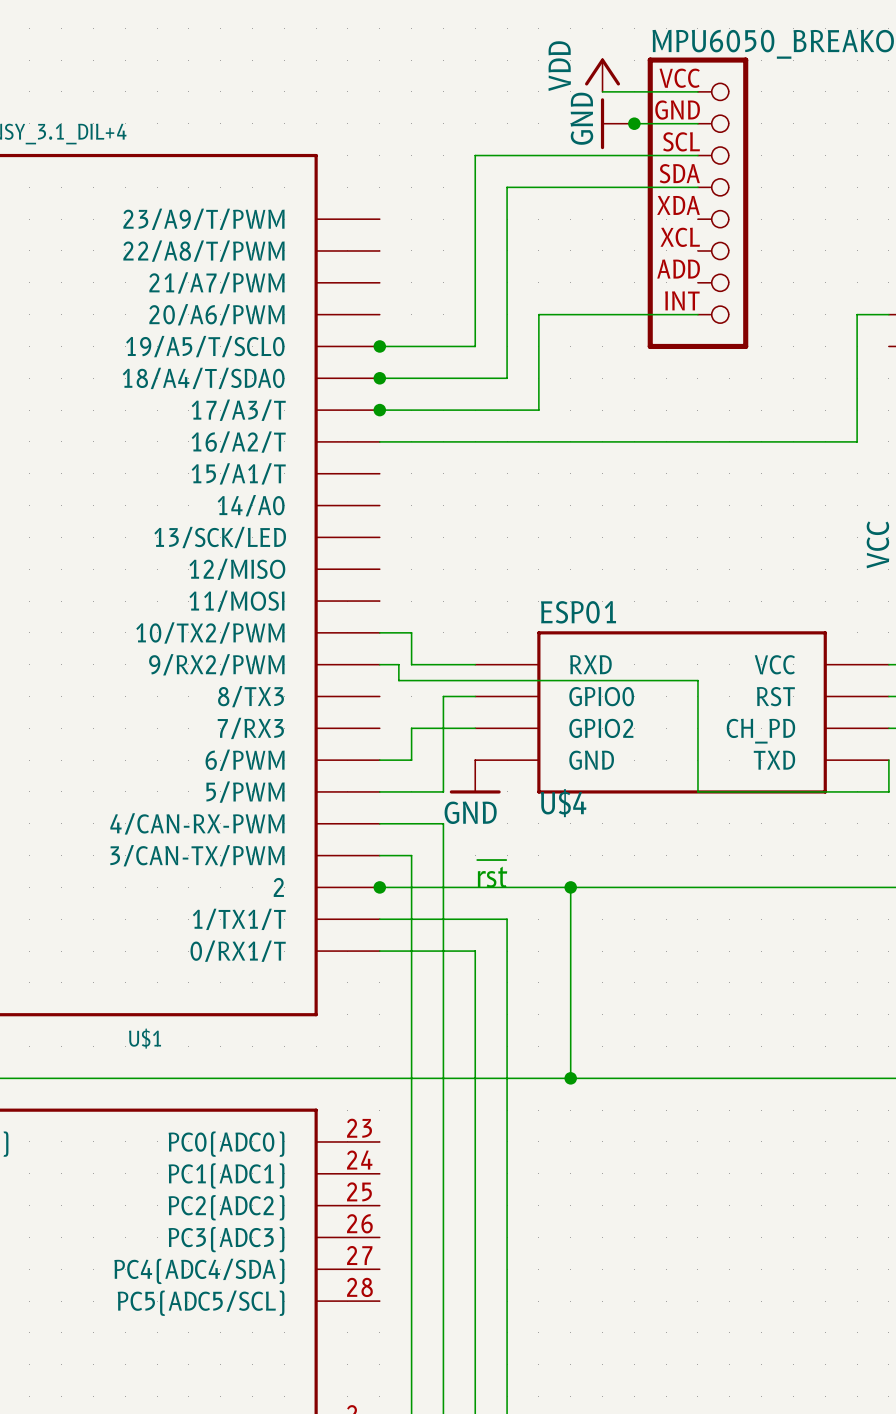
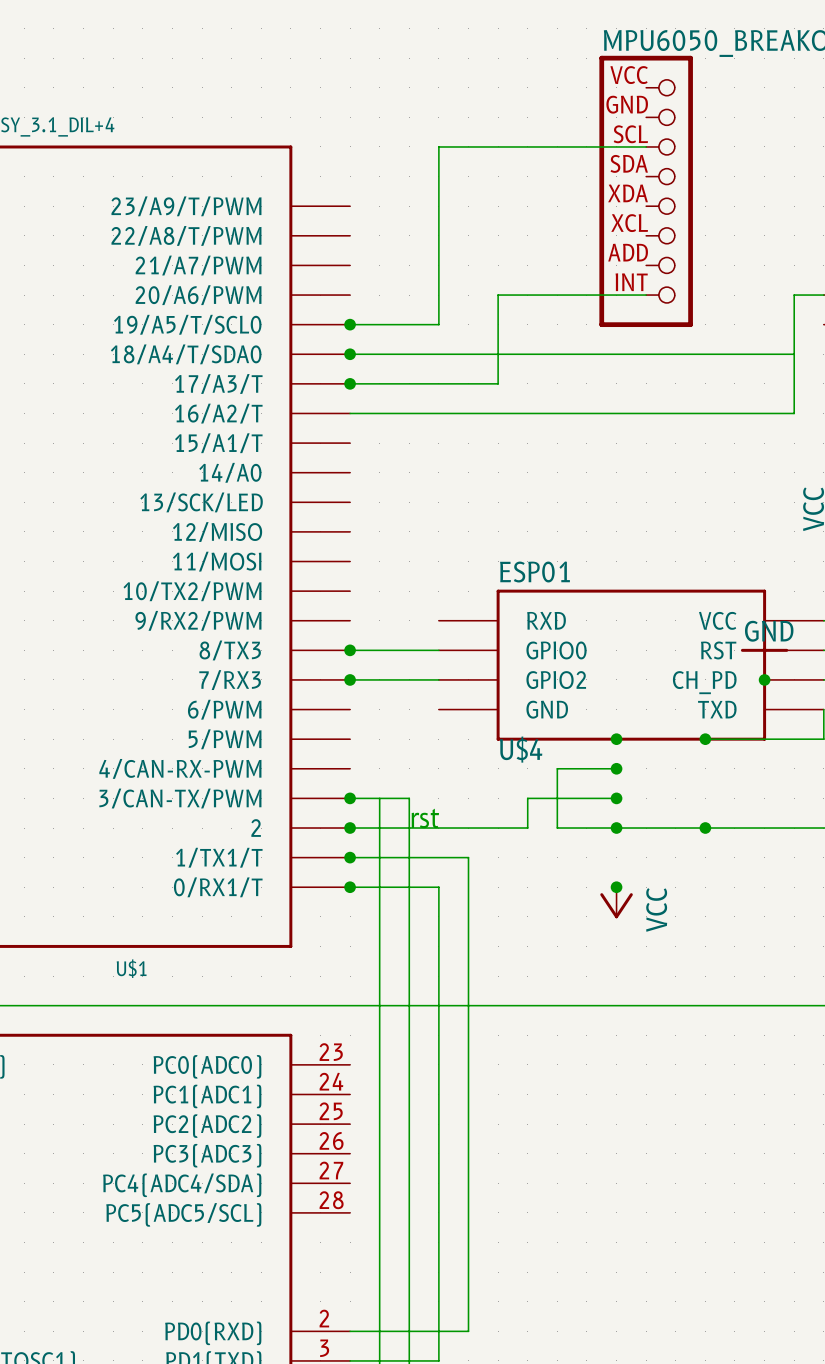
power symbol: VDD (602, 75) -> none
wire: (602, 91) (697, 91) -> none
power symbol: GND (617, 123) -> none
wire: (634, 123) (697, 123) -> none
junction: (634, 123) -> none
wire: (697, 187) (507, 187) (507, 378) -> (794, 354) (468, 354)
wire: (379, 632) (411, 632) (411, 664) (475, 664) -> none
wire: (379, 664) (398, 664) (398, 680) (697, 680) (697, 791) (761, 791) -> none
junction: none -> (350, 650)
wire: (443, 696) (443, 791) (379, 791) -> (409, 650) (350, 650)
power symbol: none -> GND (764, 664)
junction: none -> (350, 679)
wire: (411, 728) (411, 760) (379, 760) -> (379, 679) (350, 679)
junction: none -> (764, 679)
power symbol: GND (475, 776) -> none
junction: none -> (616, 739)
junction: none -> (705, 739)
wire: (379, 823) (443, 823) (443, 855) -> (379, 798) (409, 798)
junction: none -> (616, 768)
junction: none -> (350, 798)
wire: none -> (616, 798) (527, 798) (527, 828)
junction: none -> (616, 798)
text: ~{rst} (492, 873) -> rst (425, 818)
junction: (570, 887) -> none
wire: (602, 887) (570, 887) (570, 1078) -> (557, 828) (557, 768) (616, 768)
junction: none -> (616, 828)
junction: none -> (705, 828)
junction: none -> (350, 857)
junction: none -> (350, 887)
junction: none -> (616, 887)
power symbol: none -> VCC (616, 902)
junction: (570, 1078) -> none

